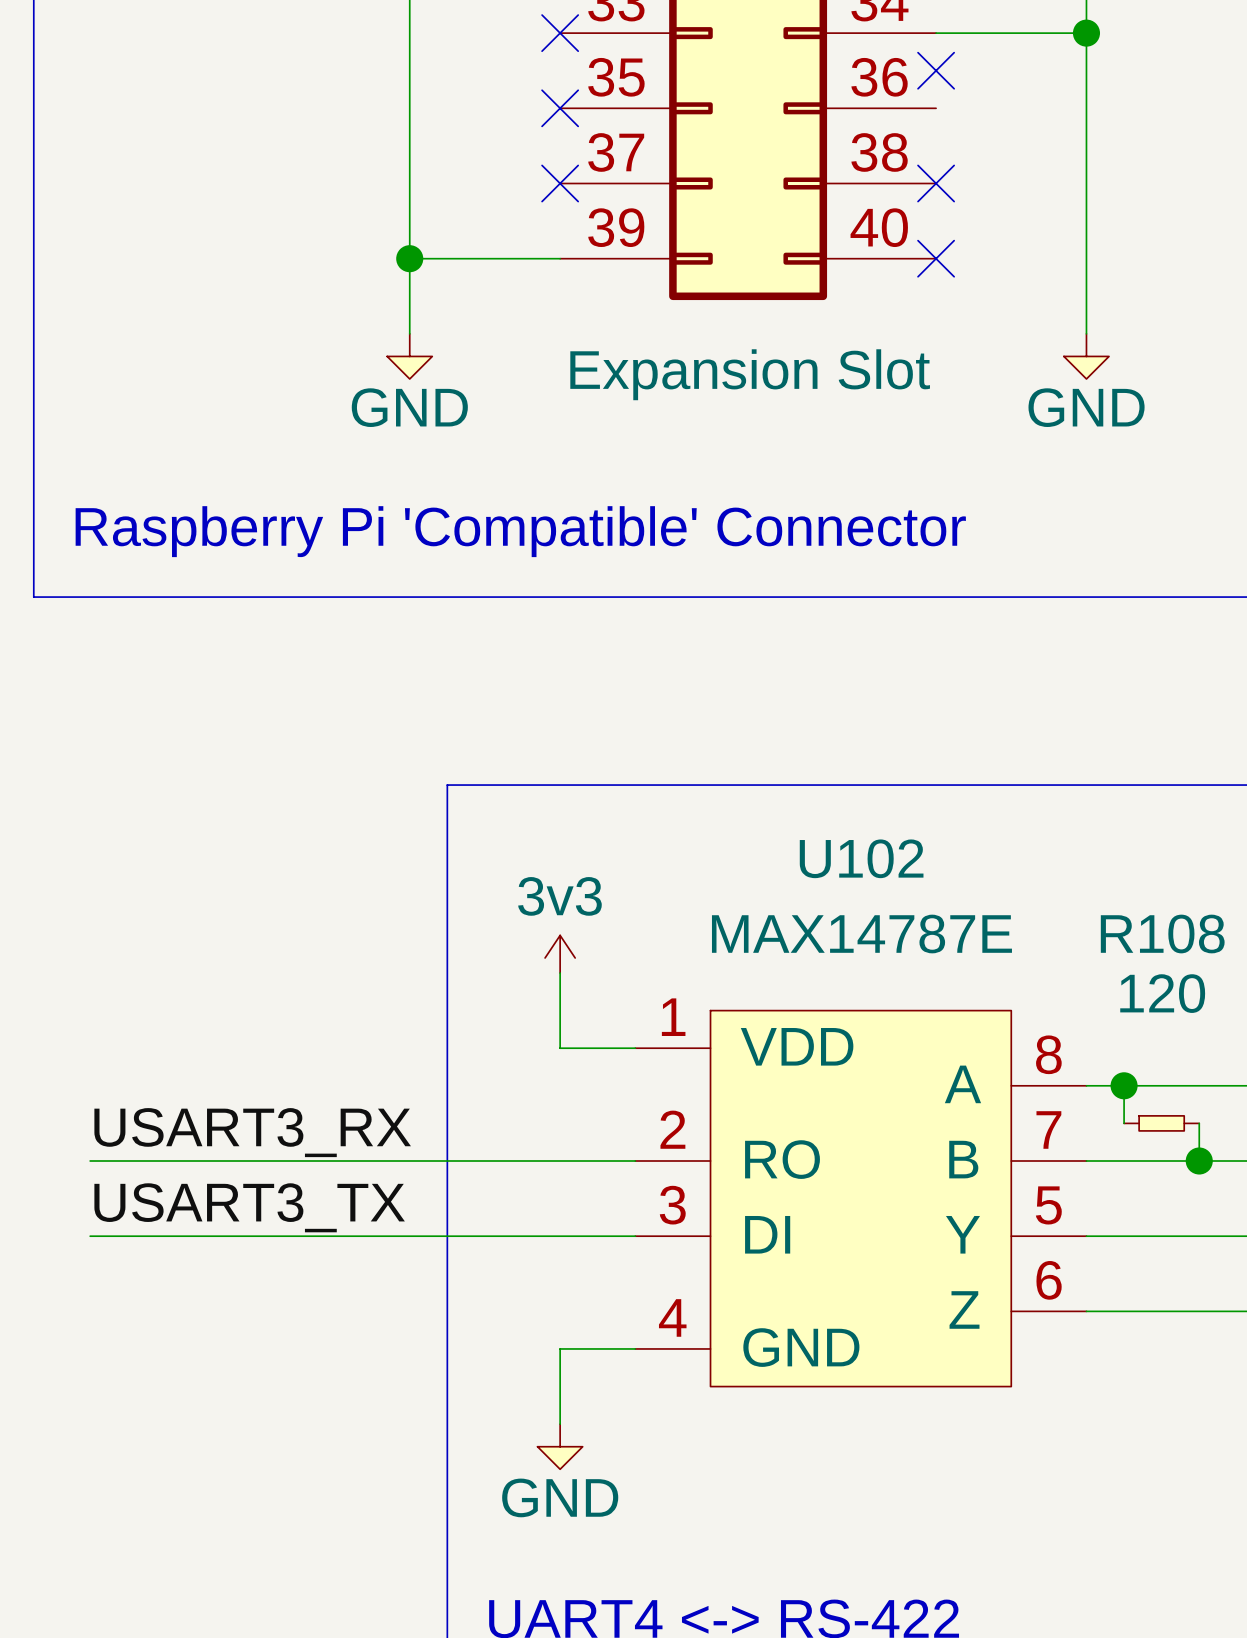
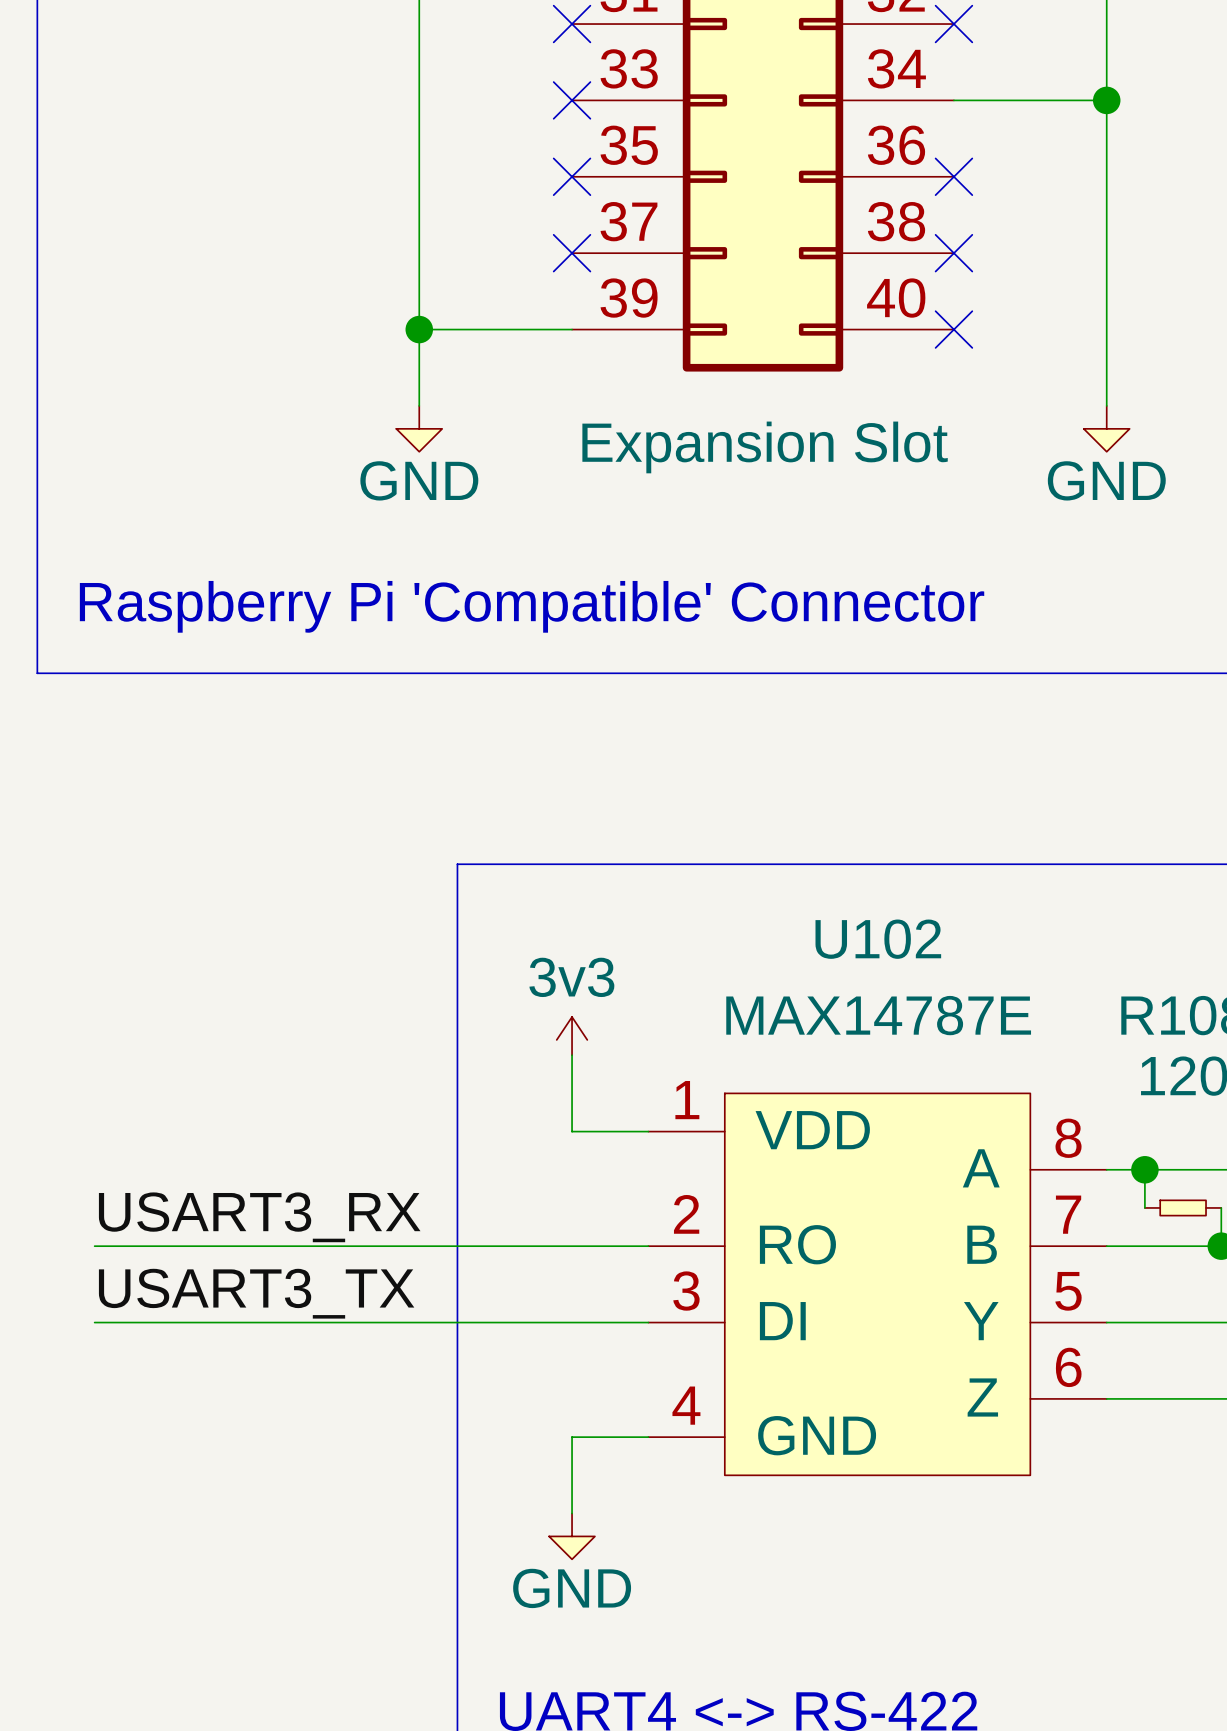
no-connect mark position: (936, 70) -> (953, 176)

